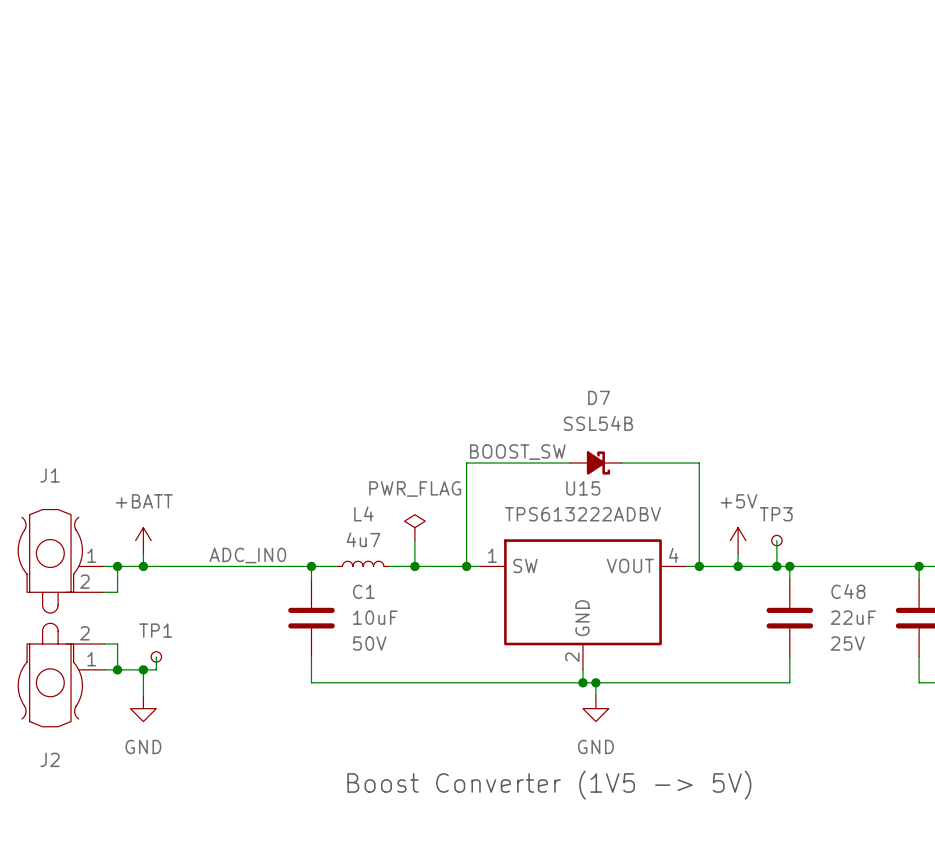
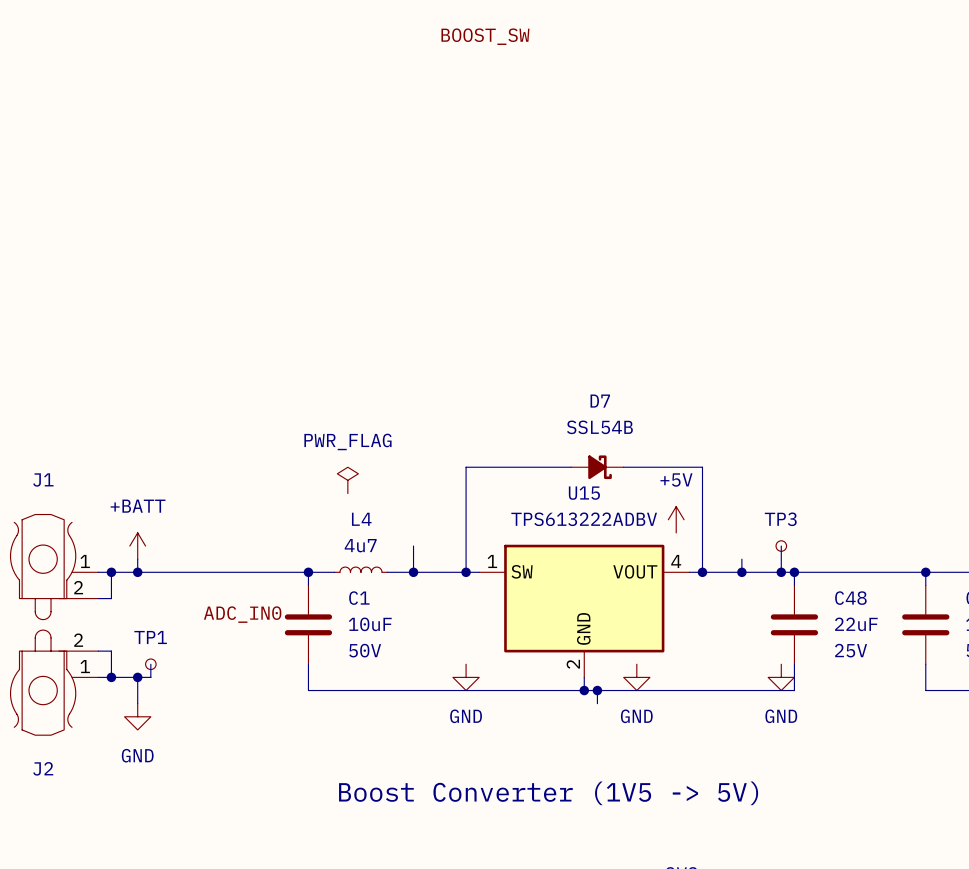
label: none -> BOOST_SW (485, 36)
label: BOOST_SW (517, 452) -> none
power symbol position: PWR_FLAG (414, 527) -> PWR_FLAG (347, 480)
power symbol position: +5V (738, 540) -> +5V (676, 519)
label position: ADC_IN0 (247, 555) -> ADC_IN0 (242, 614)
power symbol: none -> GND (466, 677)
power symbol: none -> GND (781, 677)
power symbol position: GND (595, 708) -> GND (636, 677)

